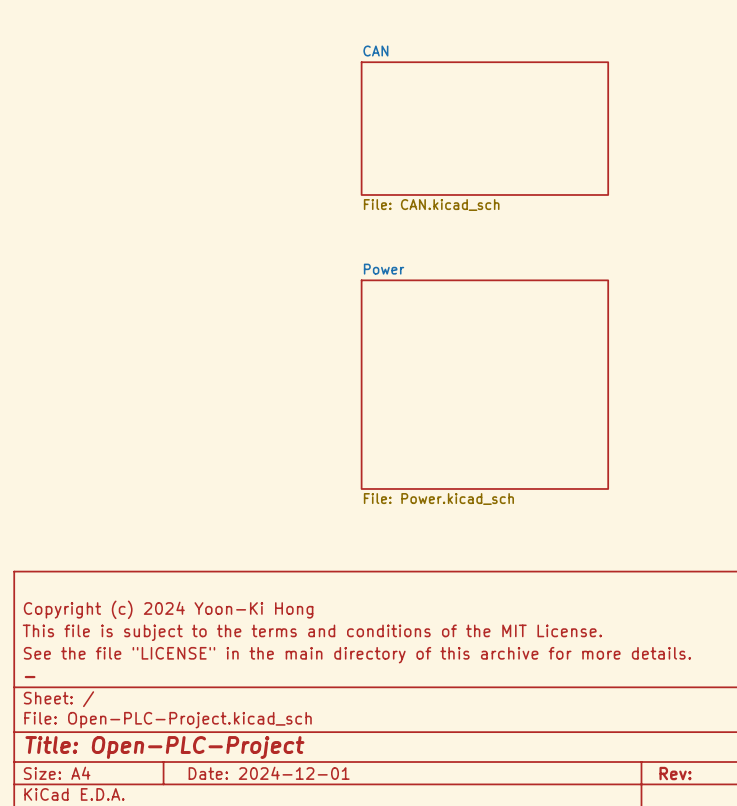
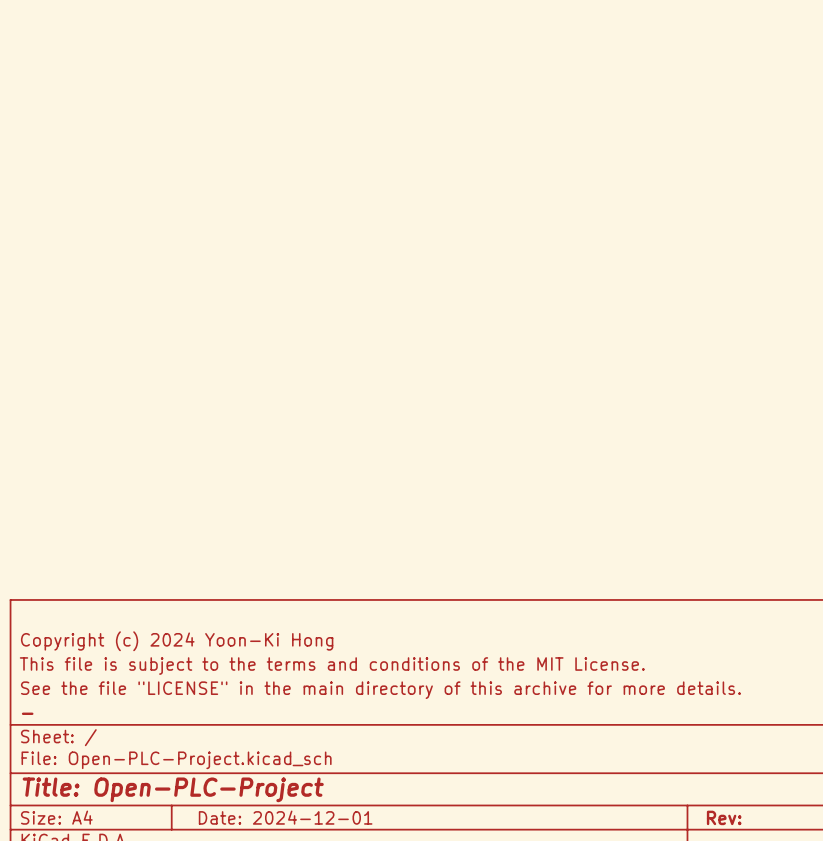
sheet CAN: File: CAN.kicad_sch (484, 128) -> none
sheet Power: File: Power.kicad_sch (484, 384) -> none

